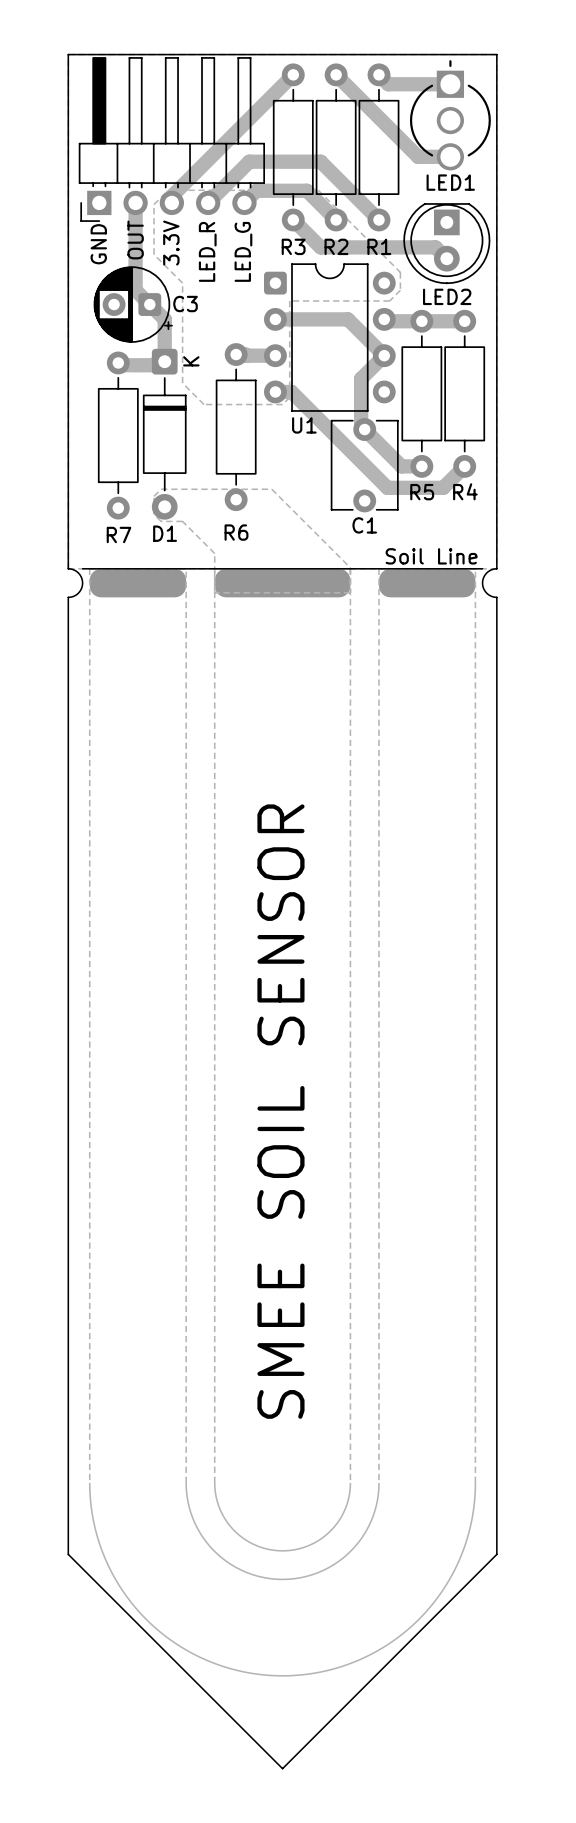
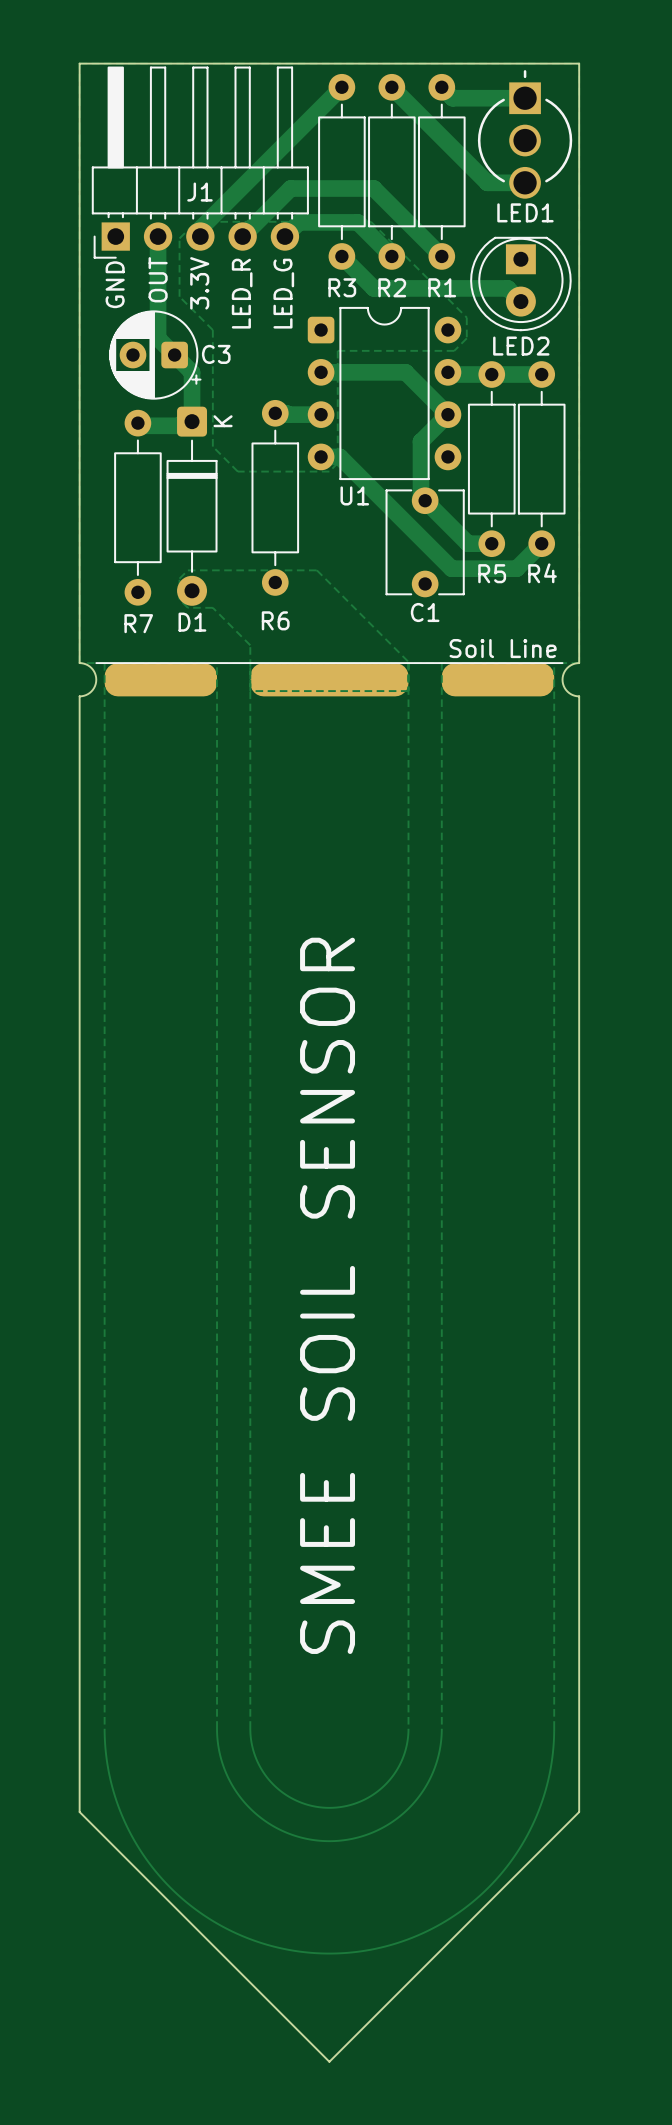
J1 name: none -> J1 (199, 192)

